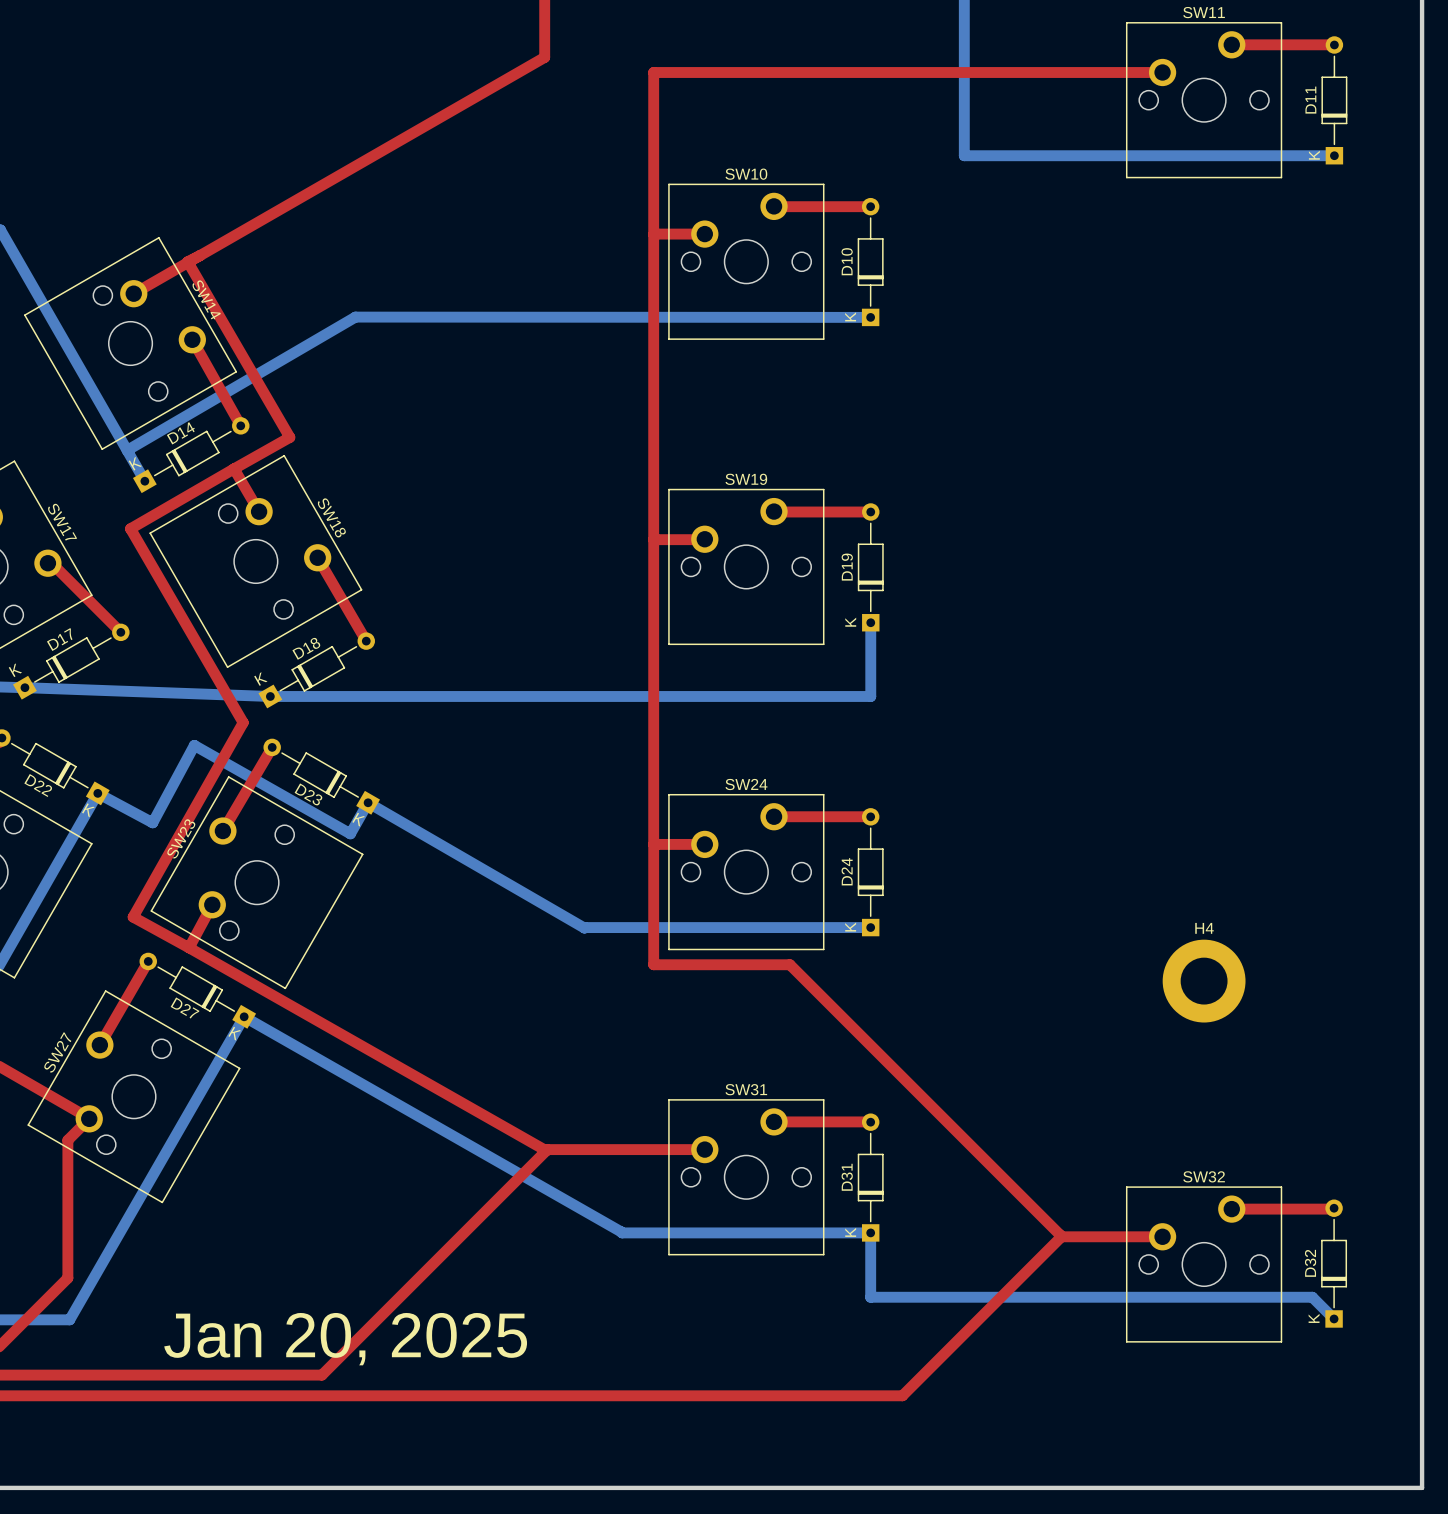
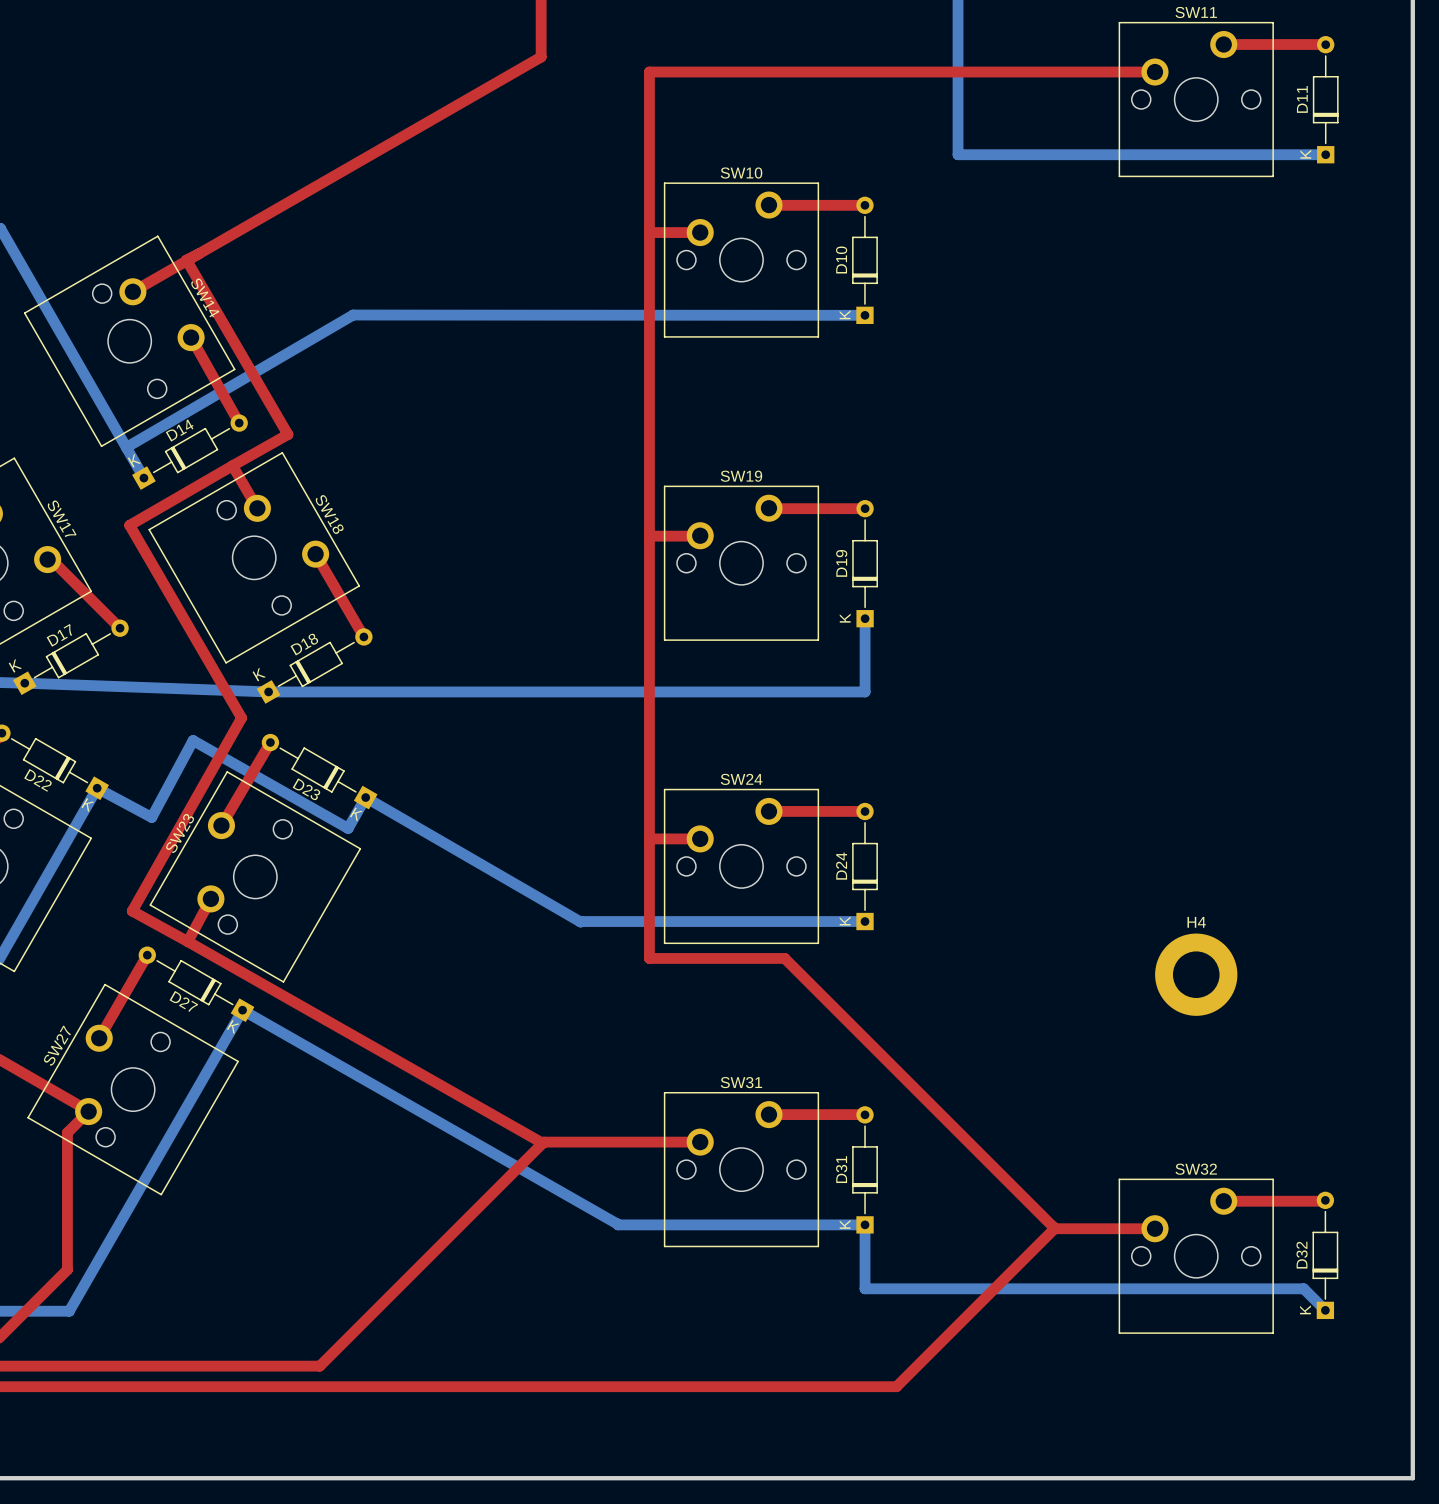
text: Jan 20, 2025 (345, 1339) -> none

